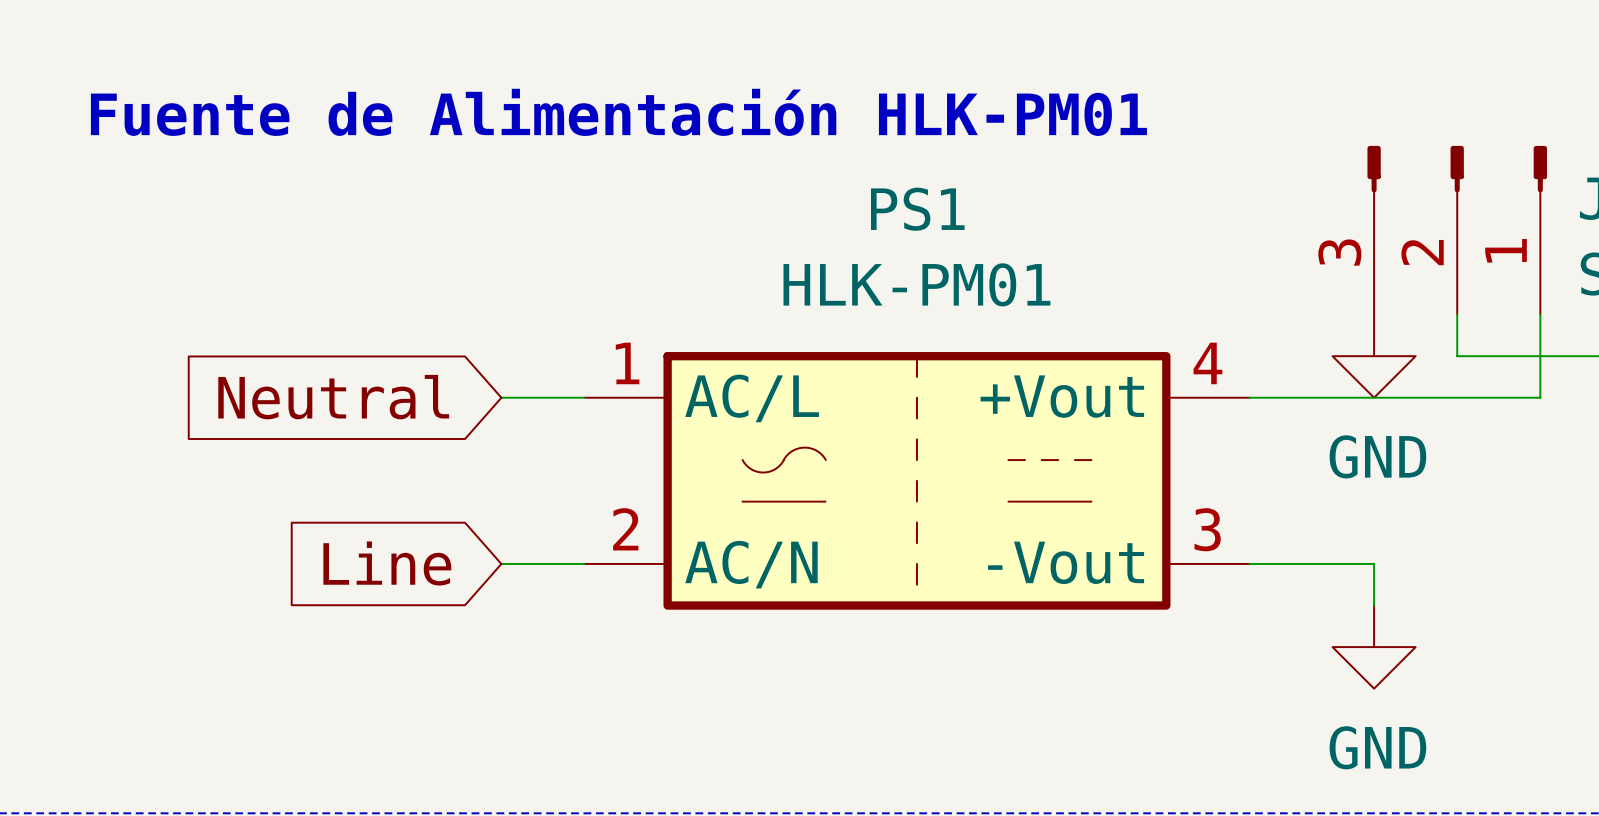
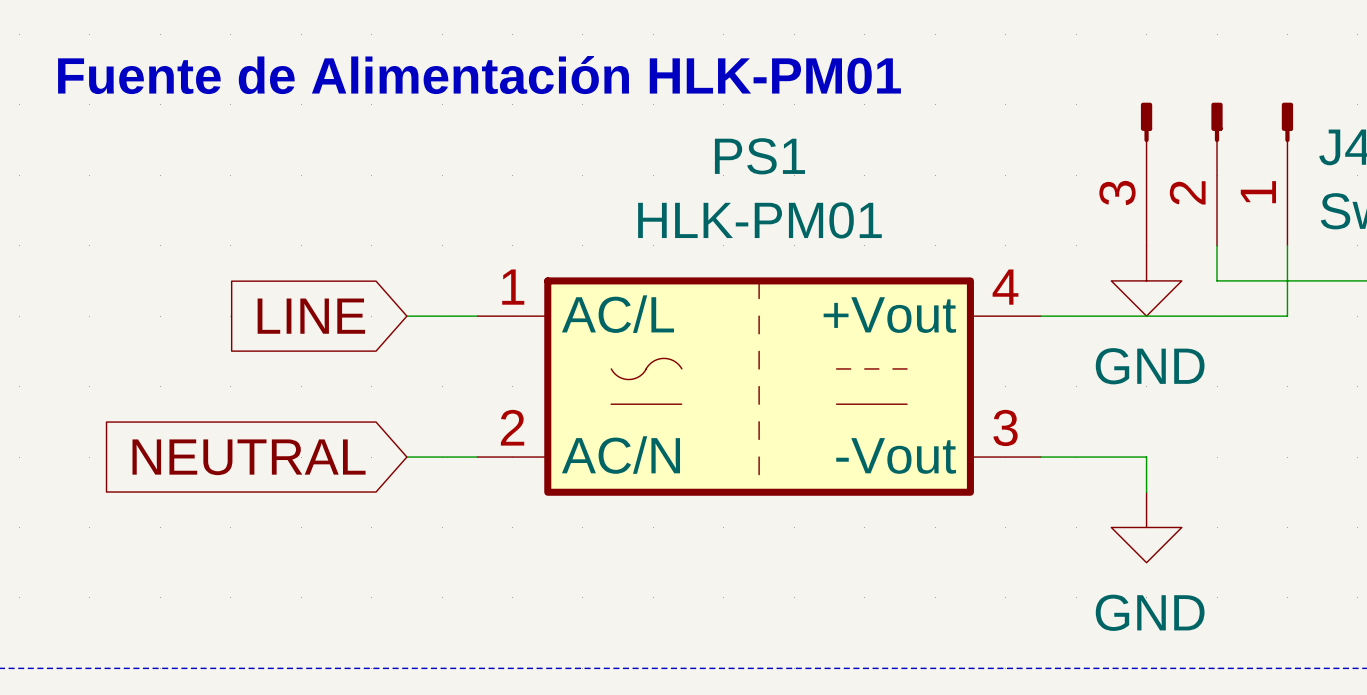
global label: Neutral (333, 397) -> LINE (311, 316)
global label: Line (387, 563) -> NEUTRAL (249, 457)

